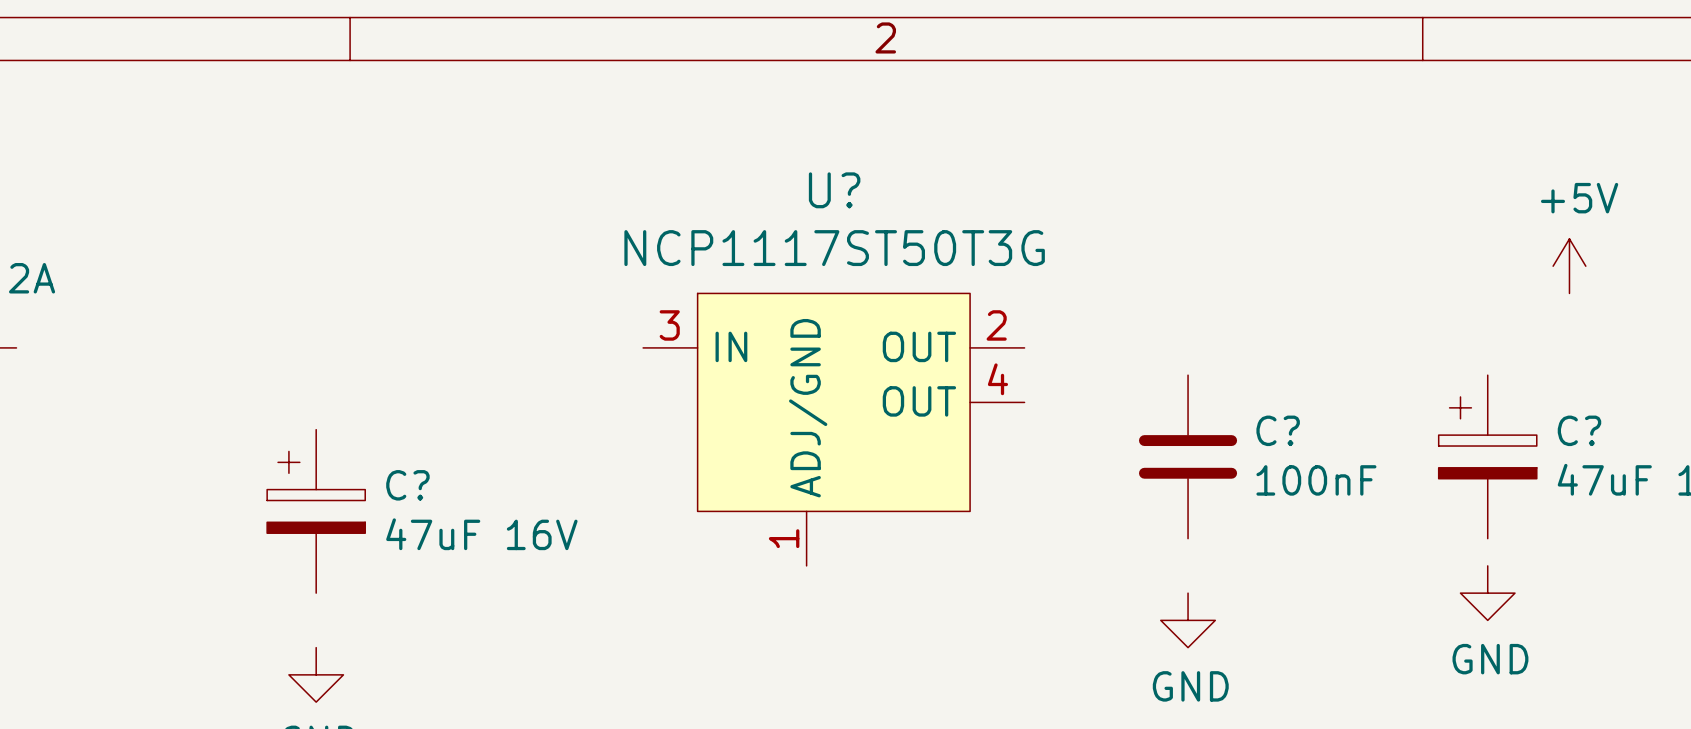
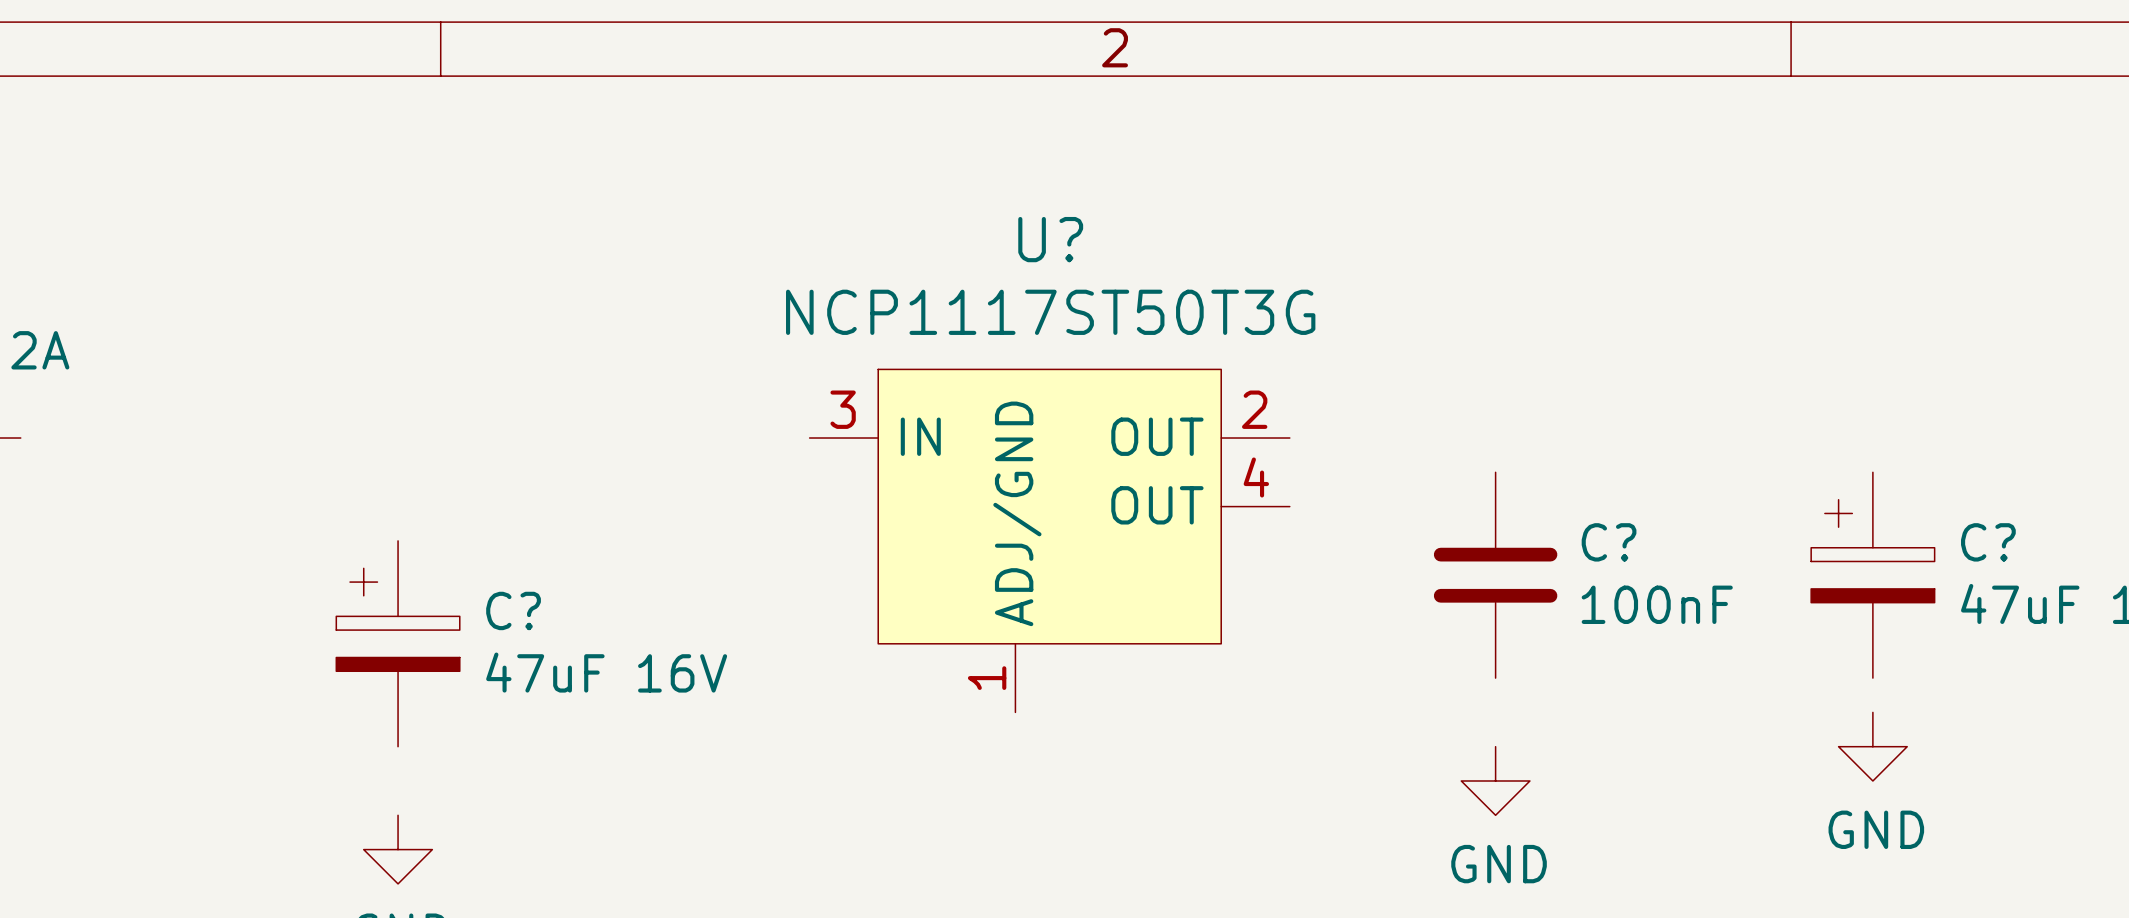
power symbol: +5V (1569, 266) -> none

